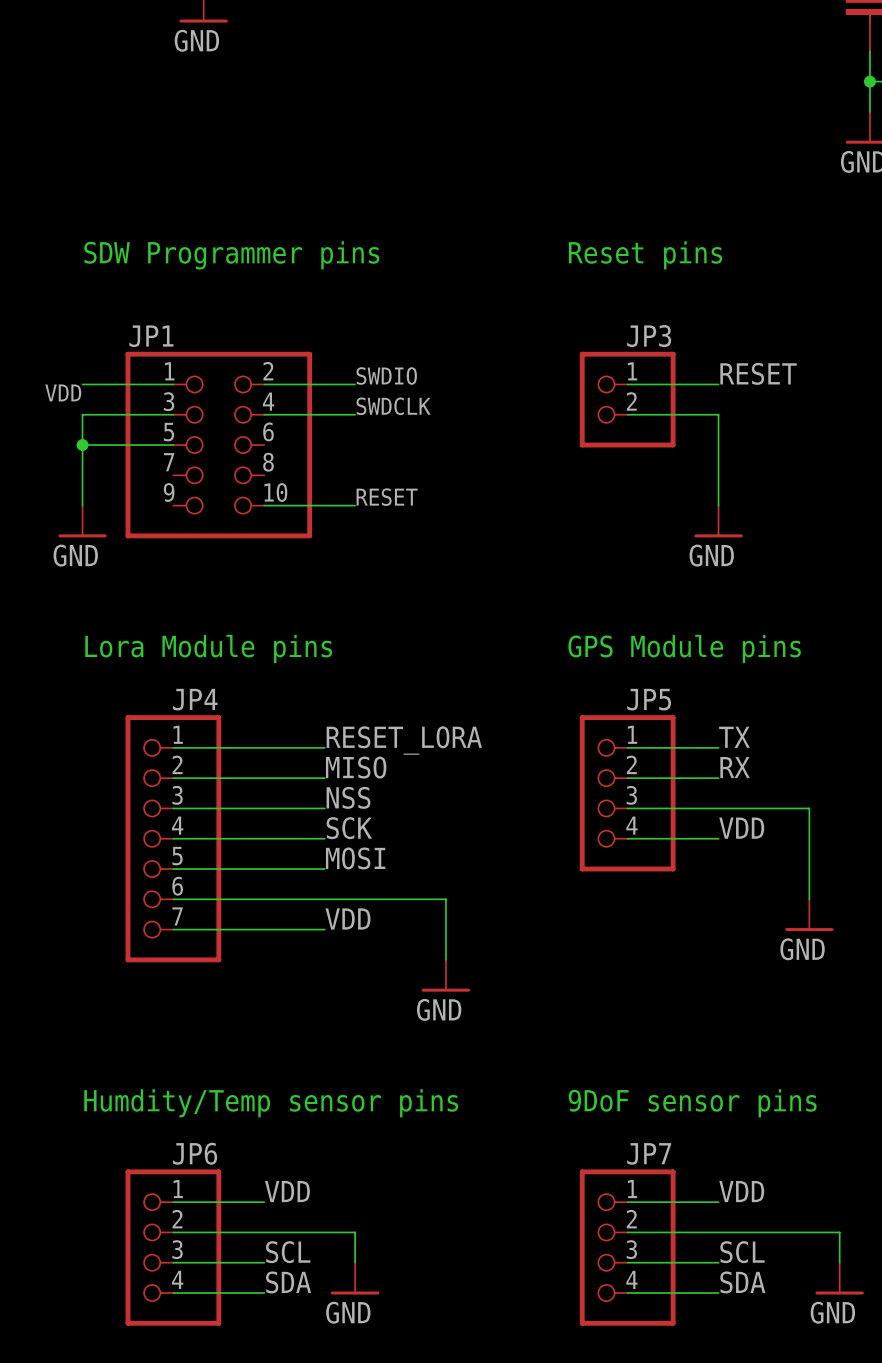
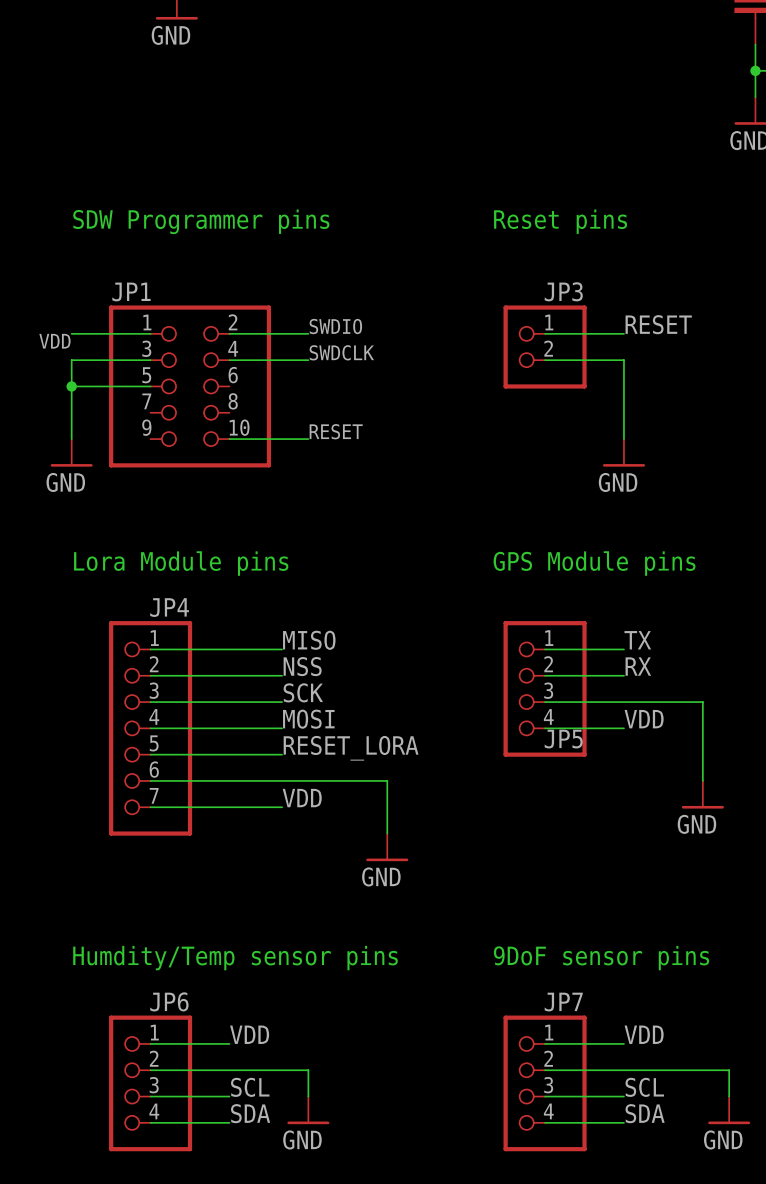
JP5 name position: JP5 (649, 699) -> JP5 (563, 739)
label: RESET_LORA (404, 740) -> MISO (309, 640)
label: MISO (356, 767) -> NSS (302, 666)
label: NSS (348, 797) -> SCK (303, 692)
label: SCK (349, 828) -> MOSI (308, 719)
label: MOSI (355, 858) -> RESET_LORA (351, 748)

